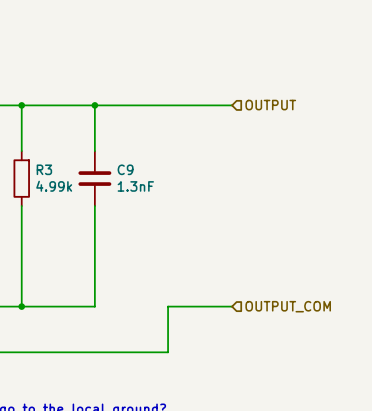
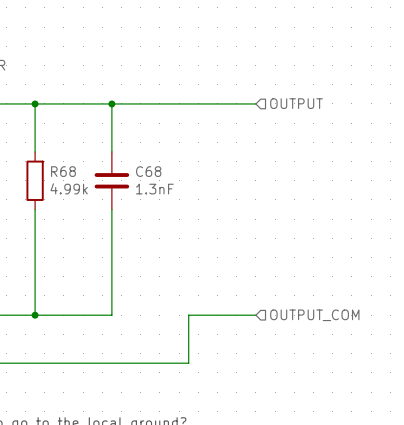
R3 name: R3 (44, 169) -> R68 (63, 171)
C9 name: C9 (125, 169) -> C68 (148, 171)

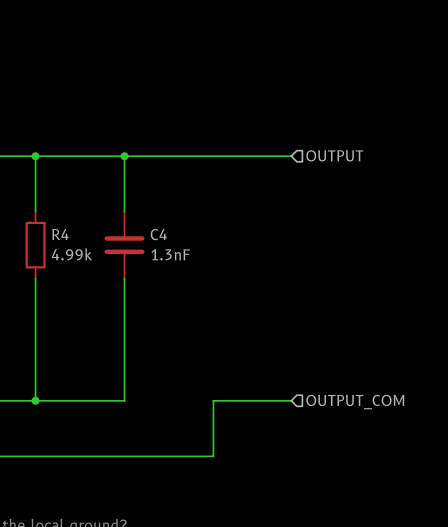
R68 name: R68 (63, 171) -> R4 (60, 234)
C68 name: C68 (148, 171) -> C4 (158, 234)

